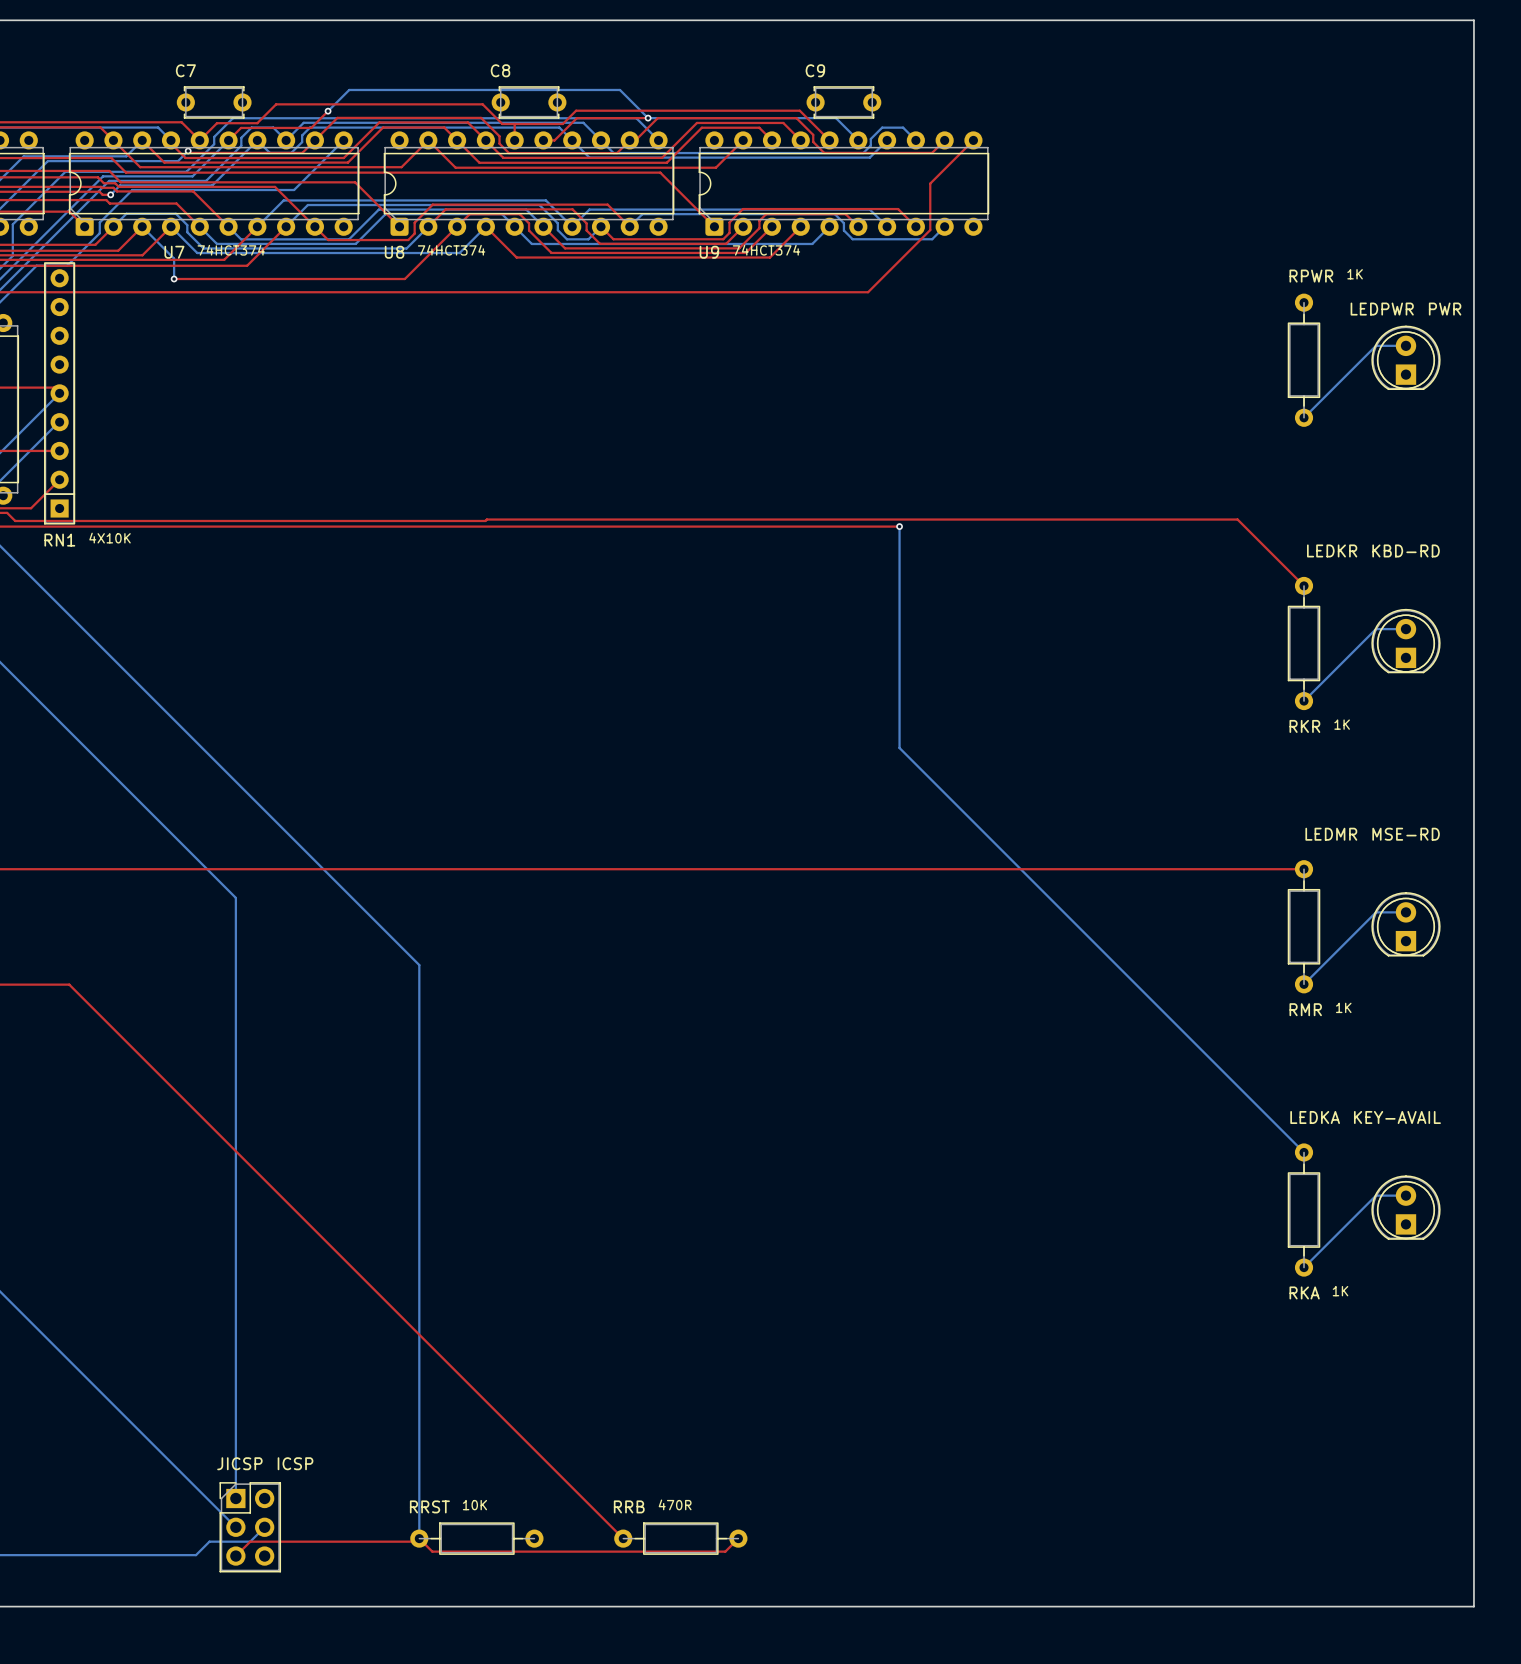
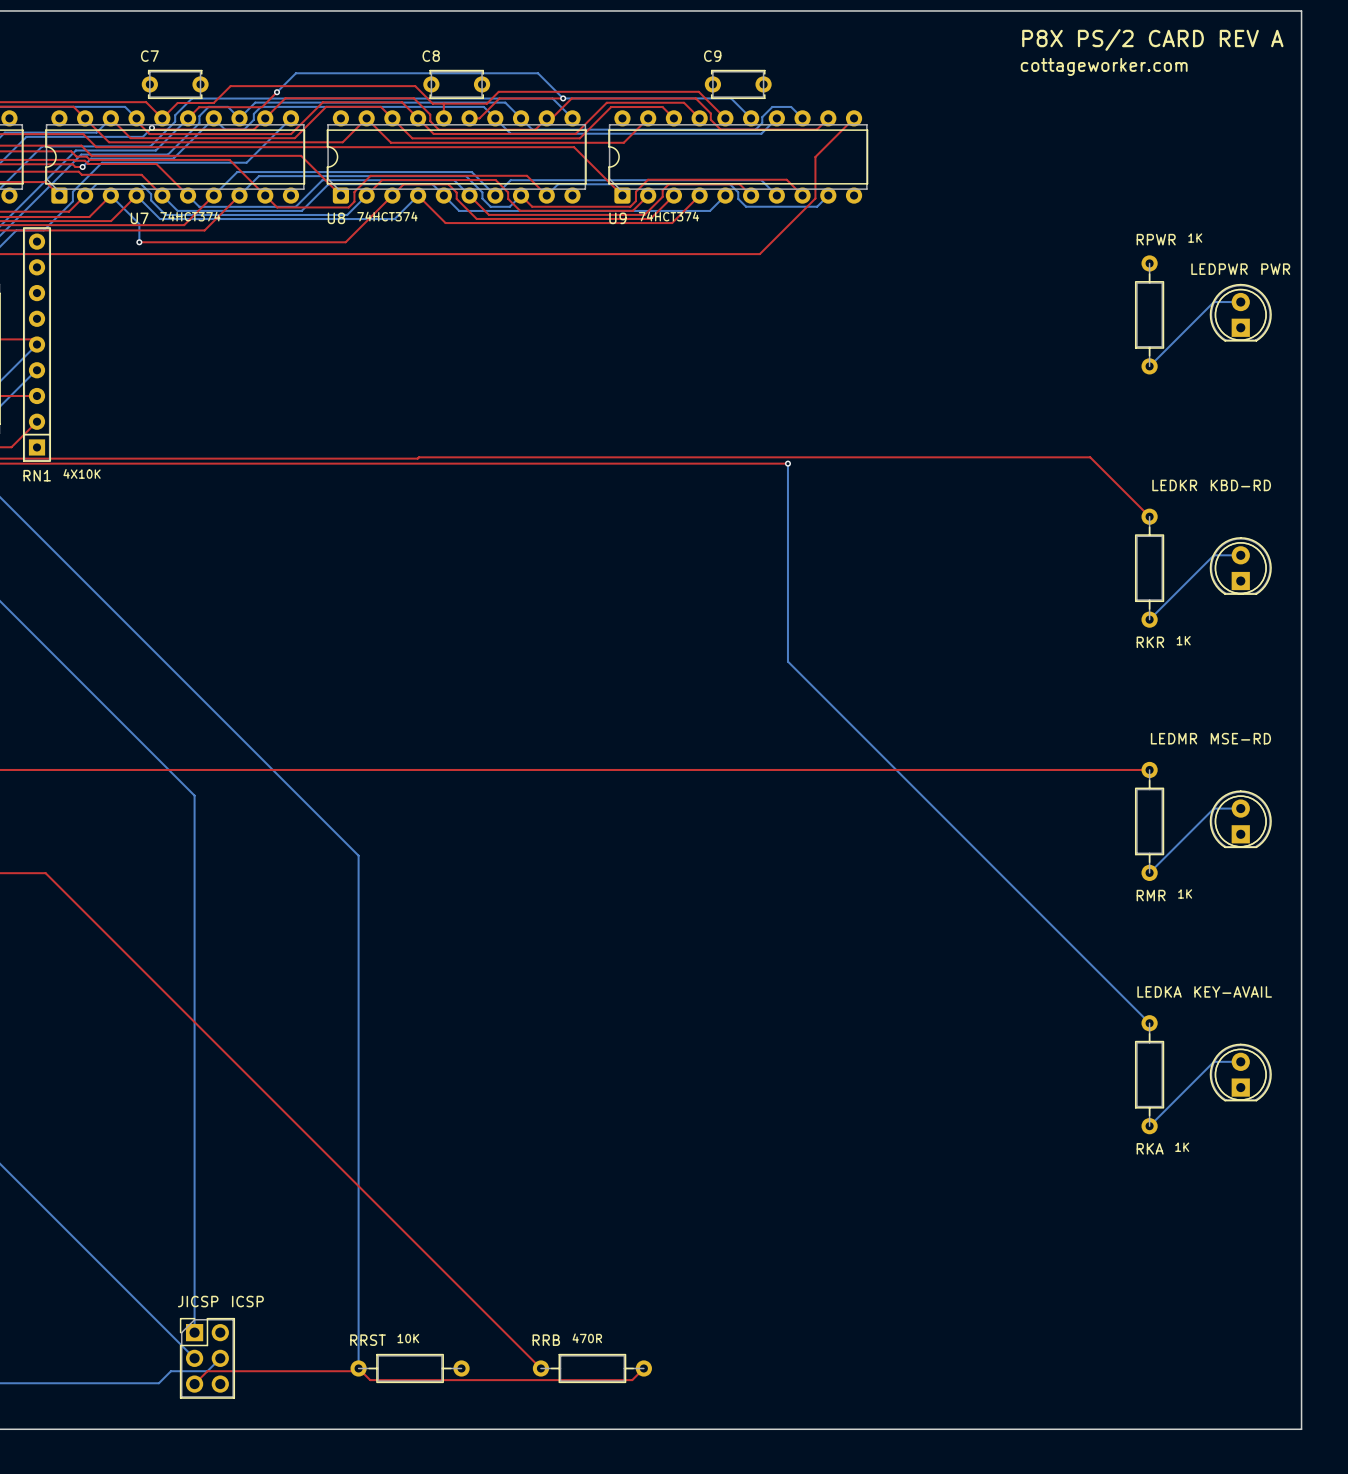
text: none -> P8X PS/2 CARD REV A (1152, 39)
text: none -> cottageworker.com (1104, 66)

